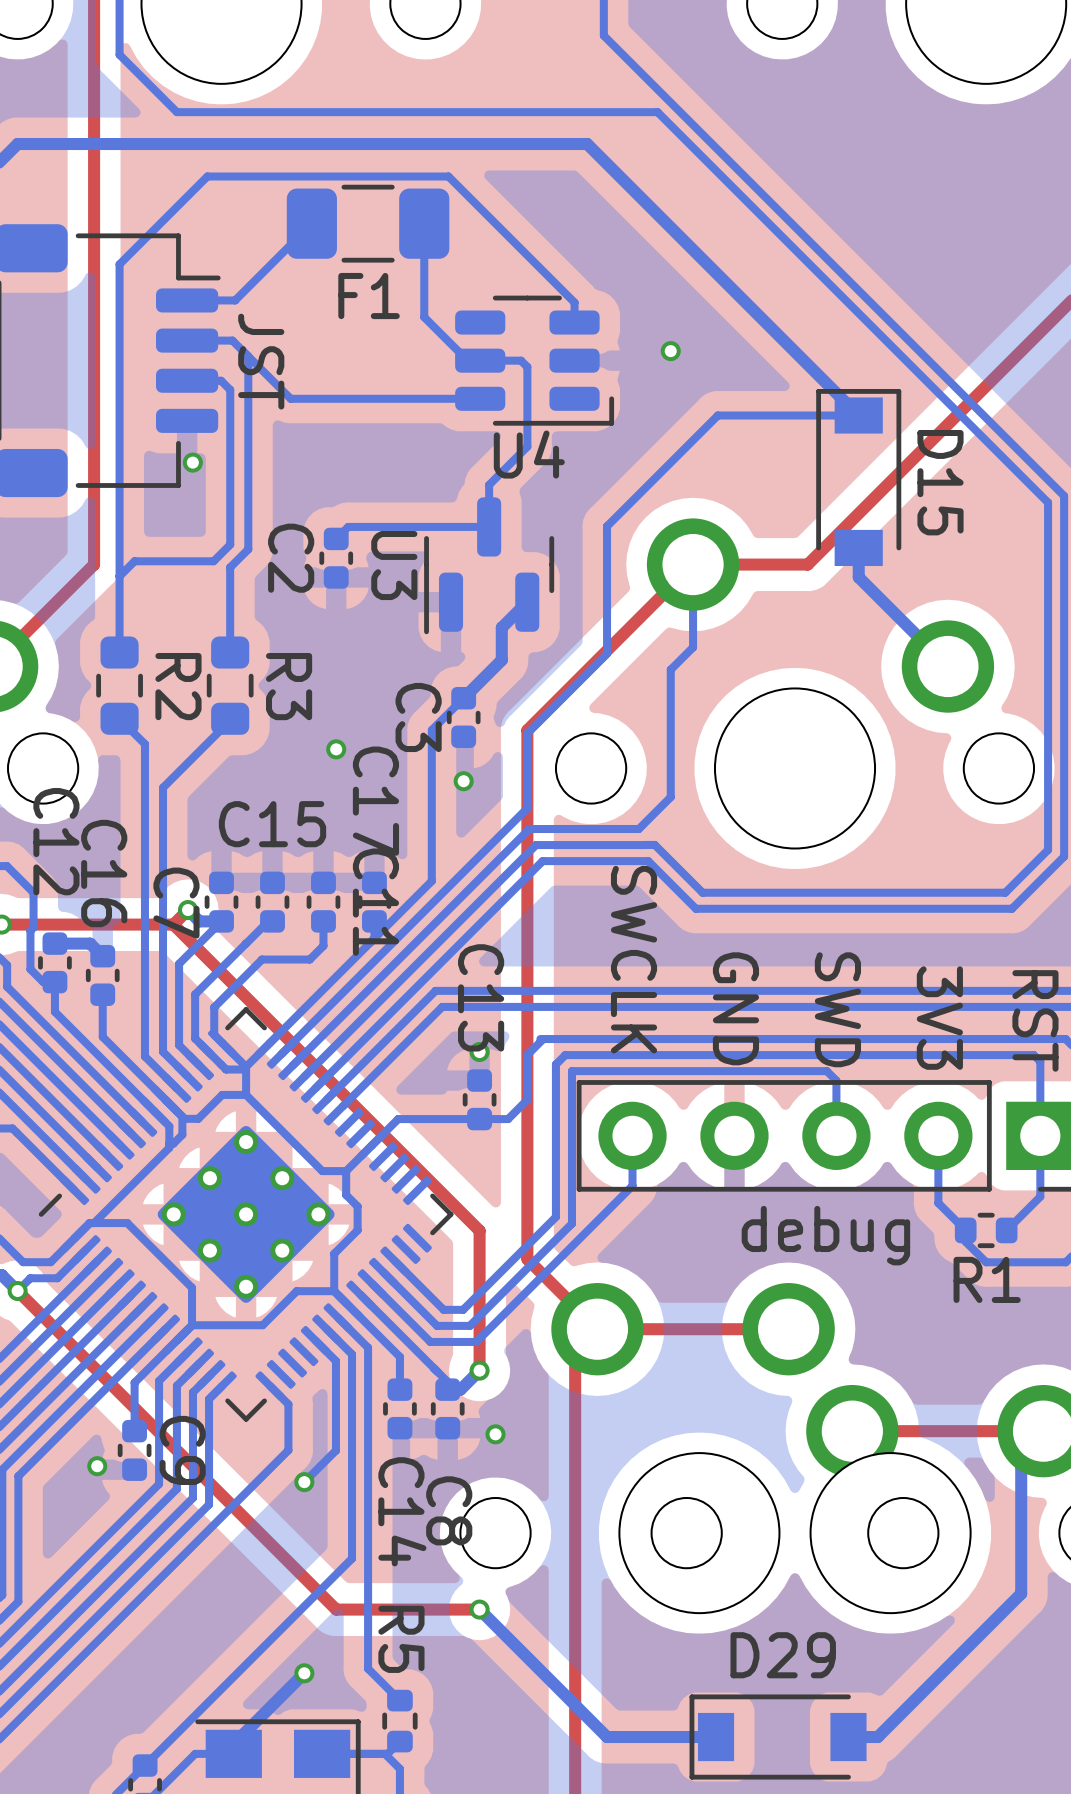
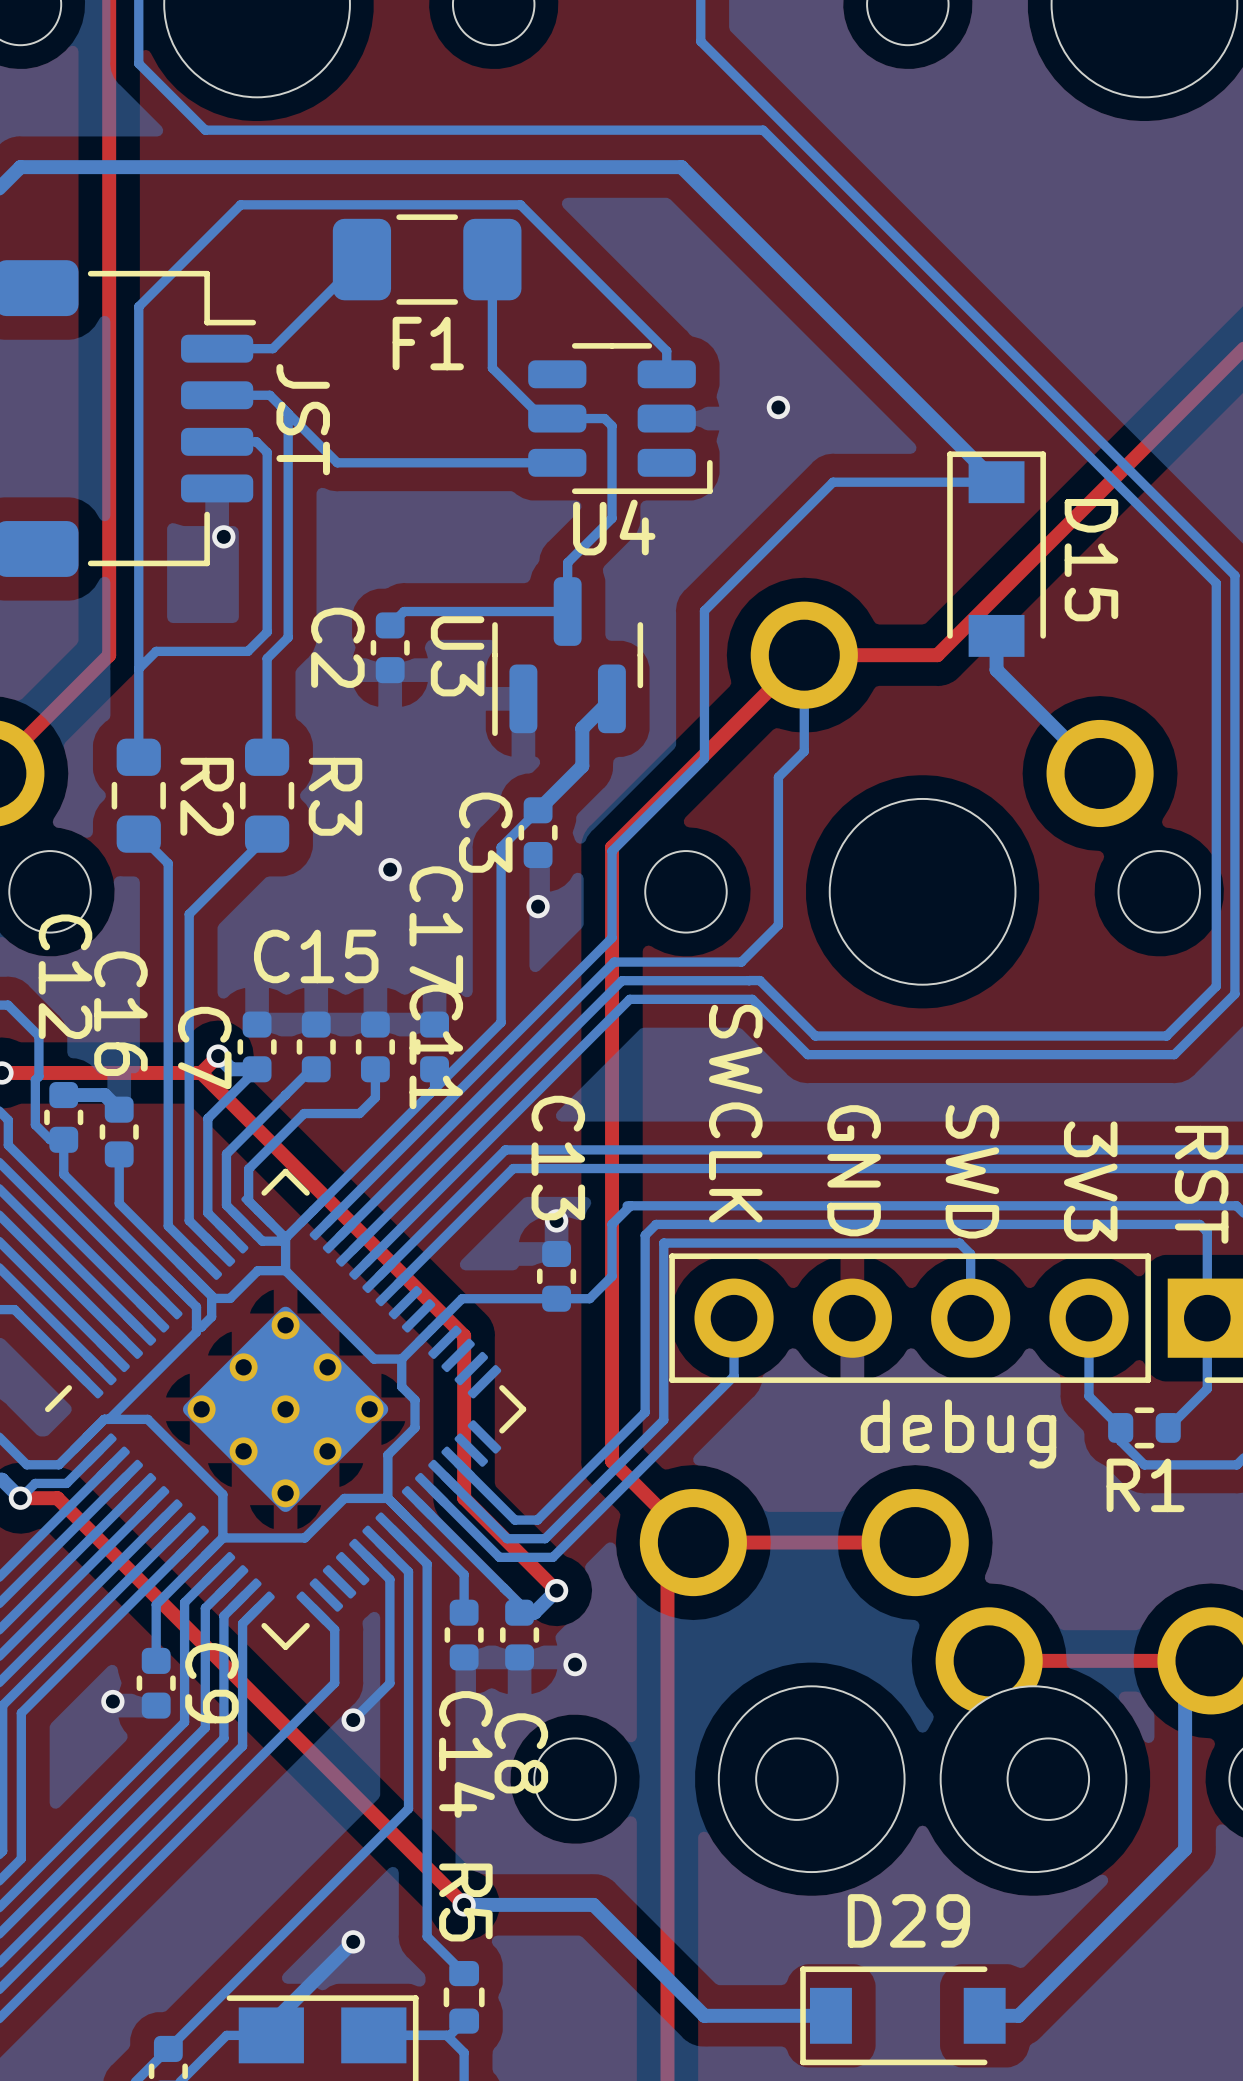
top track: (399, 1151) (479, 1230) (479, 1370) -> (464, 1335) (464, 1498) (556, 1590)
top track: (17, 1290) (336, 1609) (479, 1609) -> (20, 1498) (57, 1498) (464, 1904)
bottom track: (479, 1609) (511, 1641) -> (464, 1904) (593, 1904)
via position: (479, 1609) -> (464, 1904)

